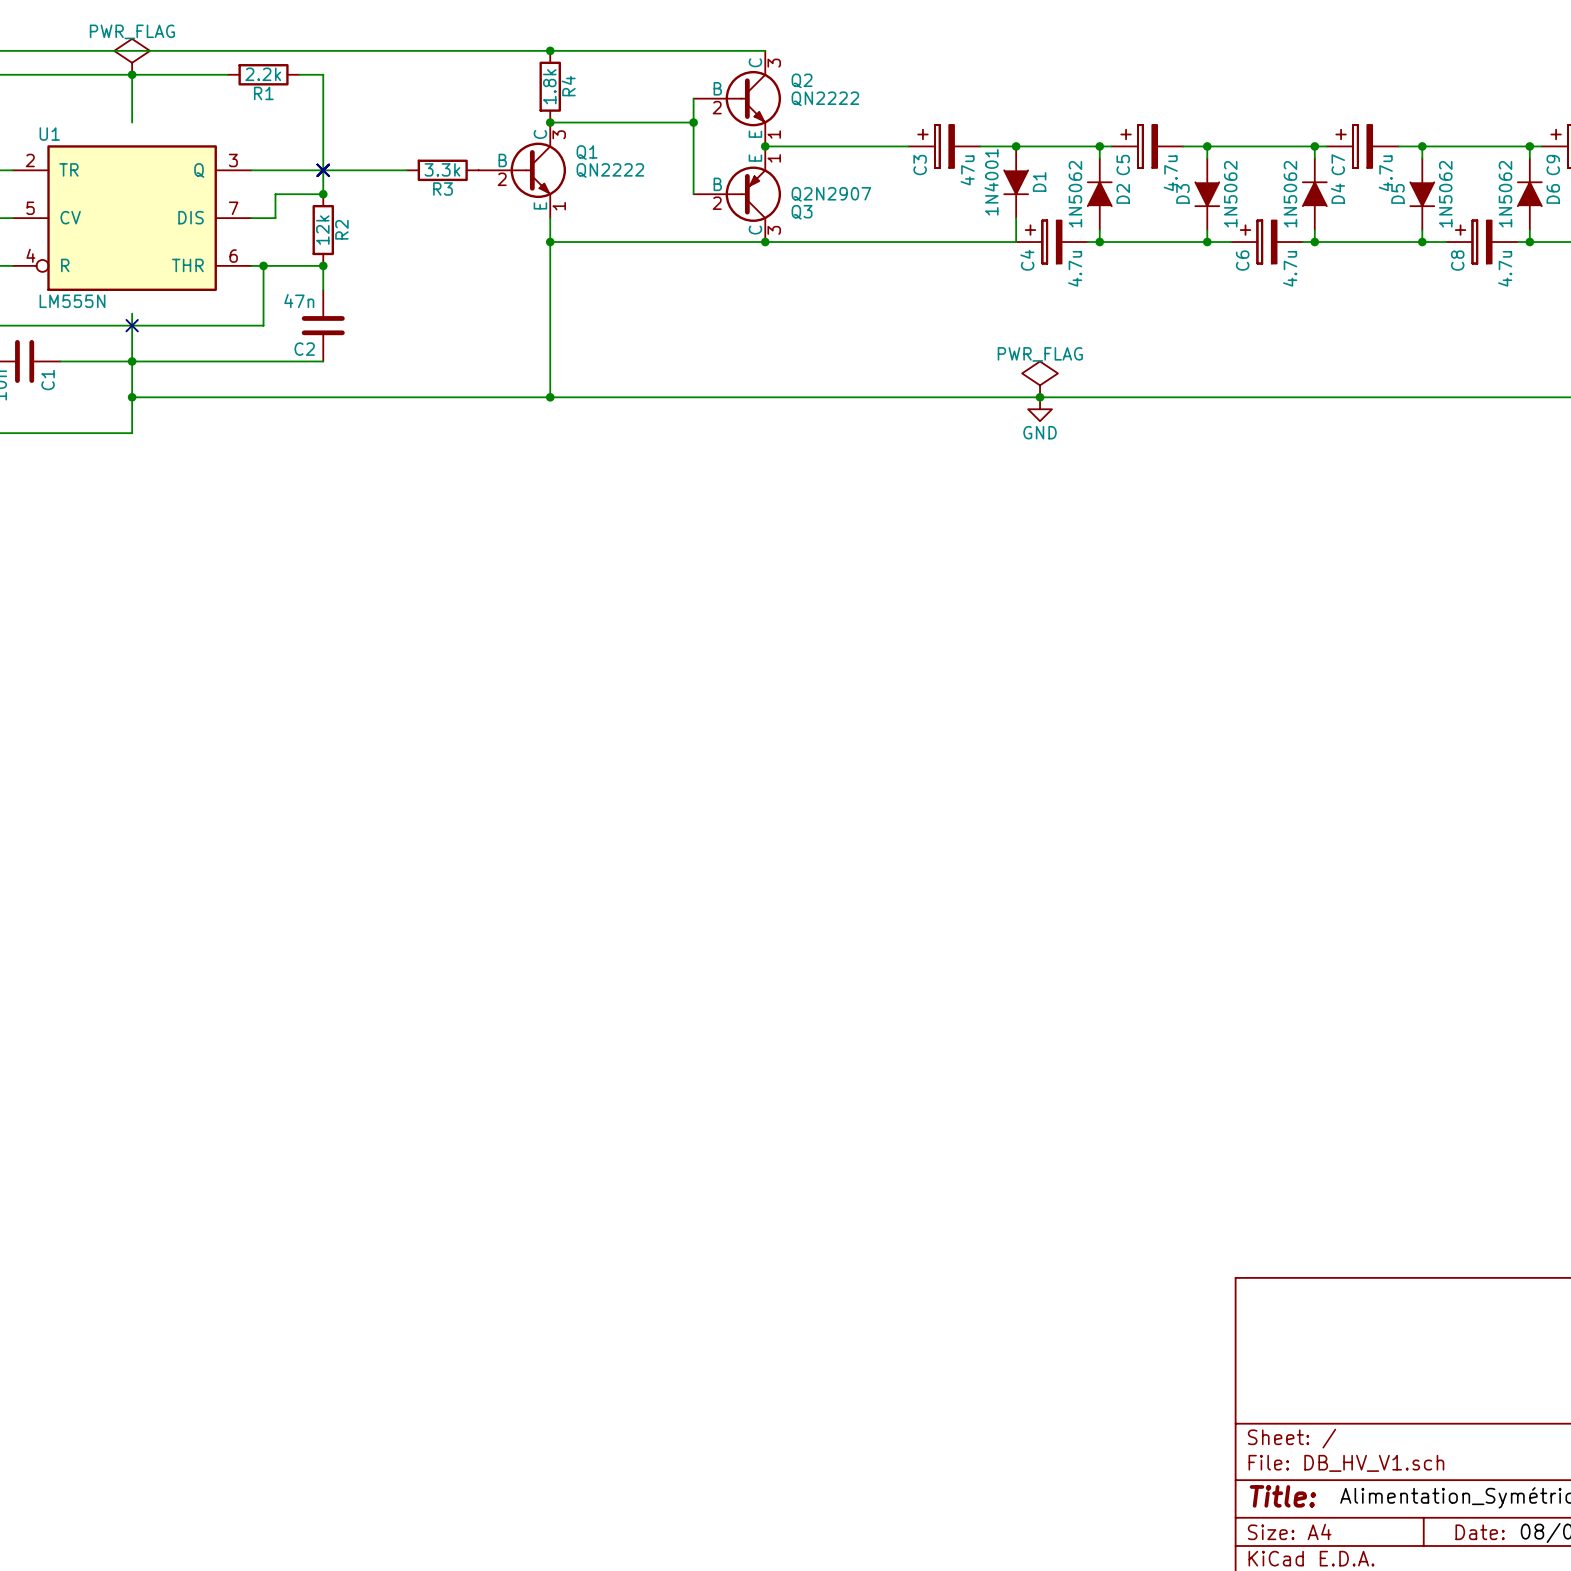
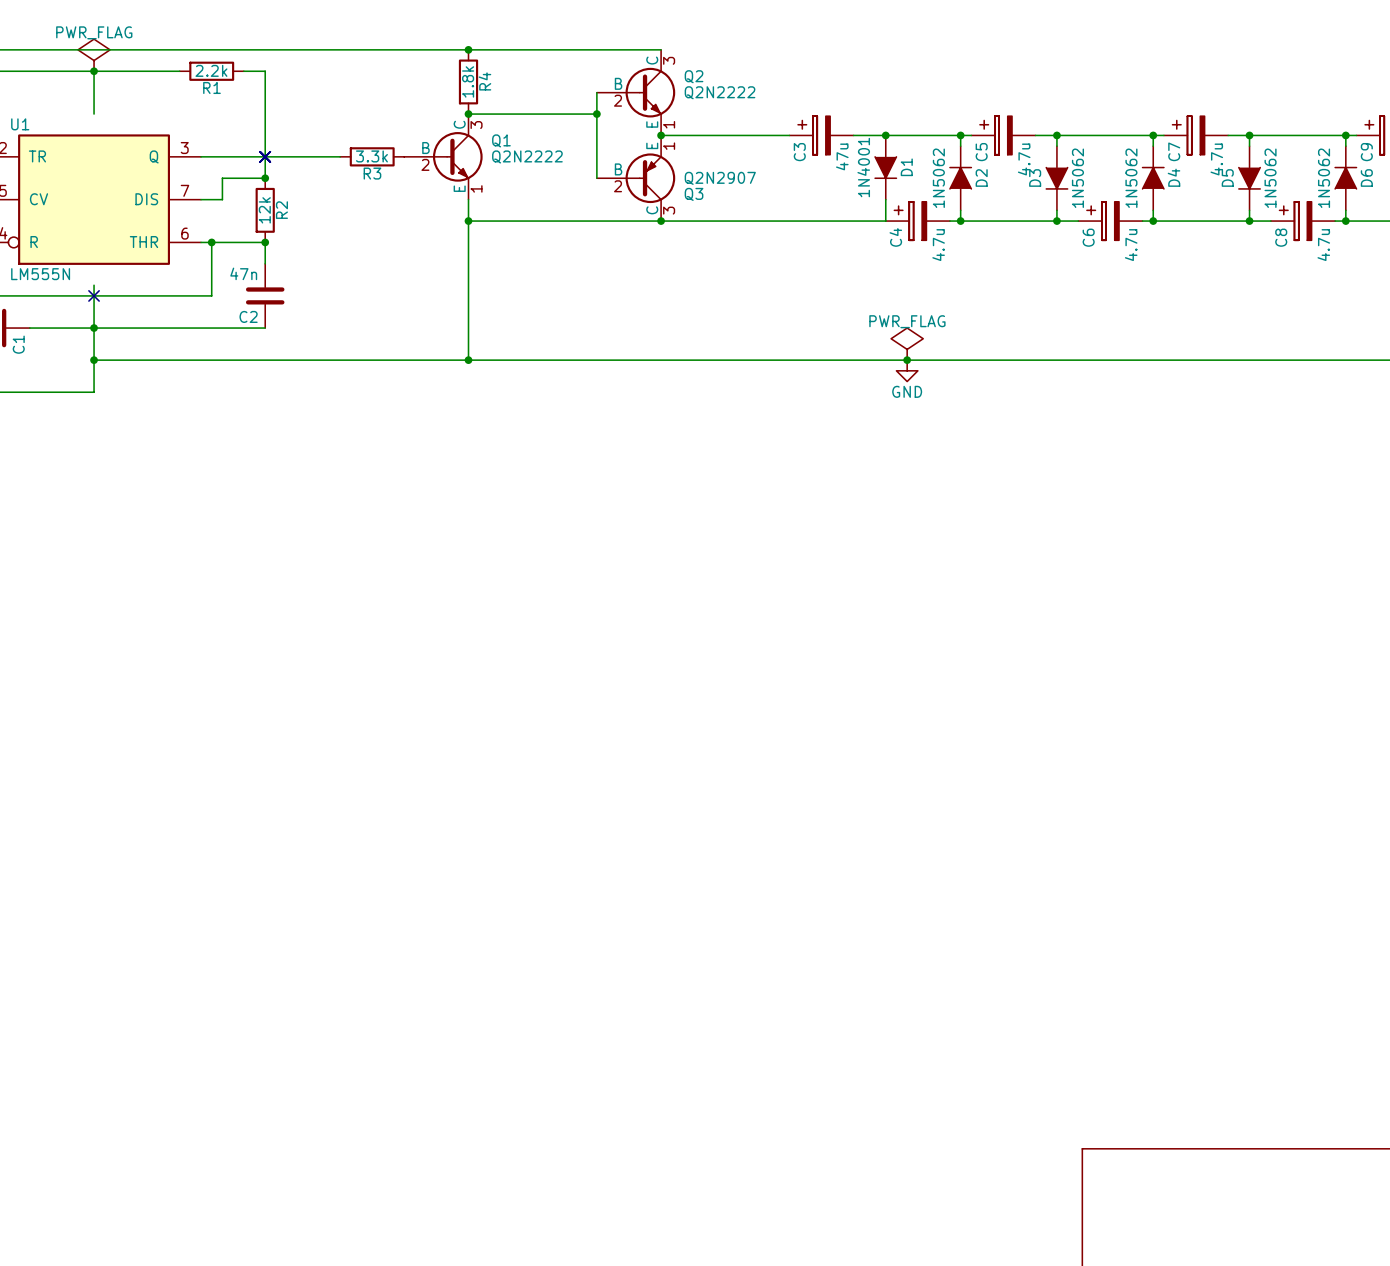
Q2 value: QN2222 (825, 98) -> Q2N2222 (720, 92)
Q1 value: QN2222 (610, 170) -> Q2N2222 (527, 156)

